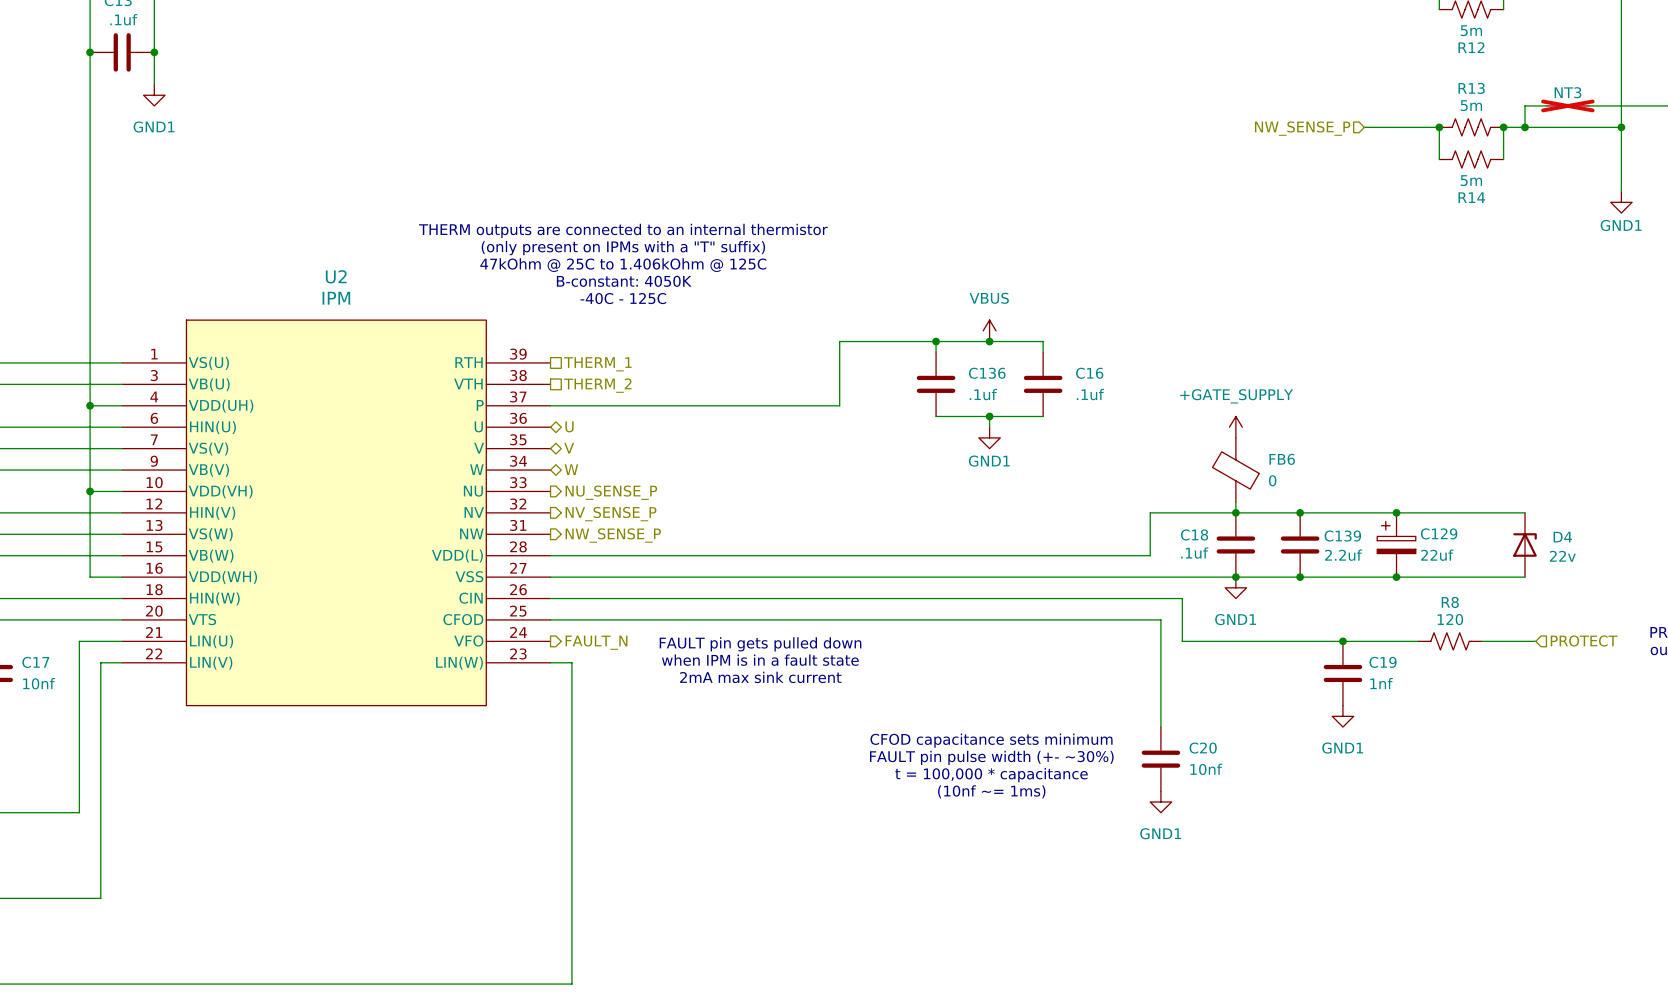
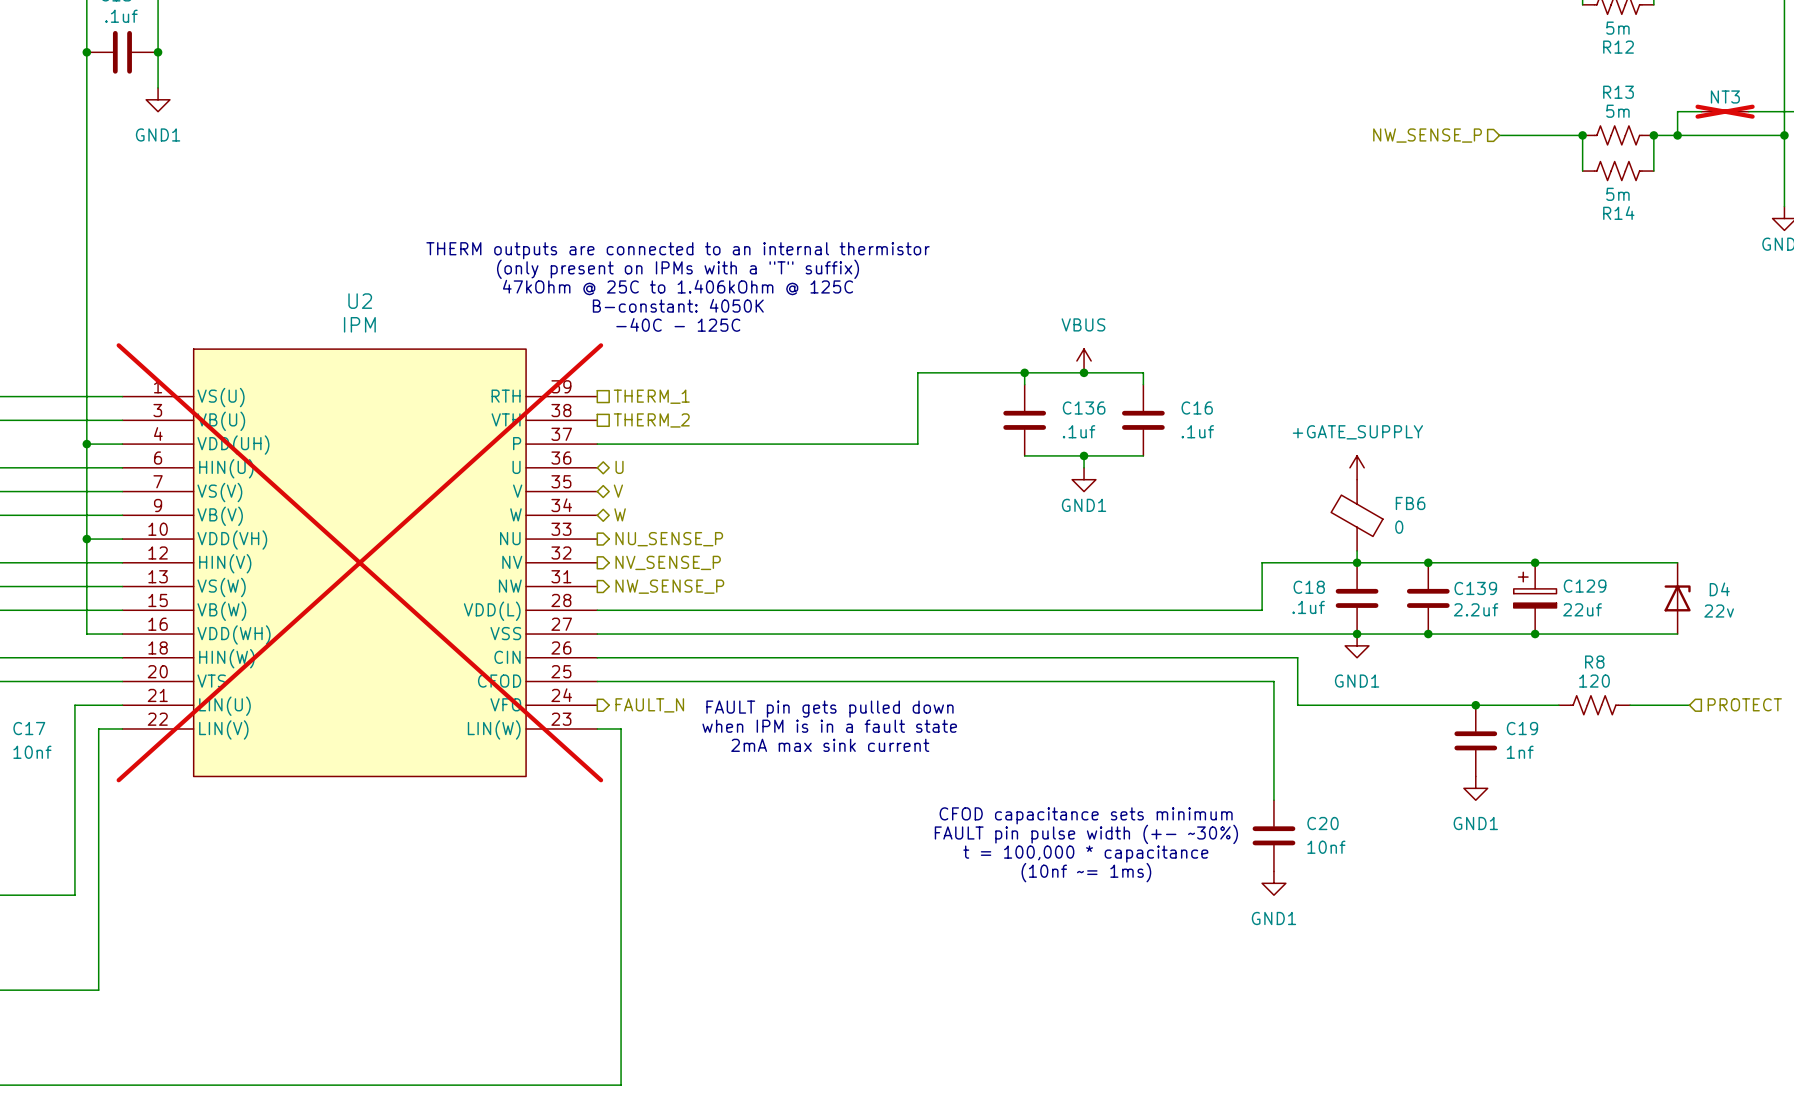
U2 do-not-place cross: none -> (359, 562)

